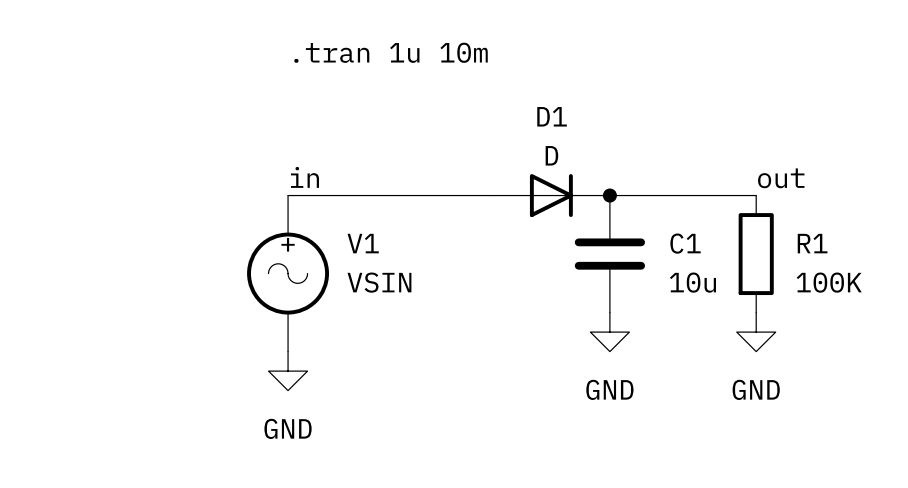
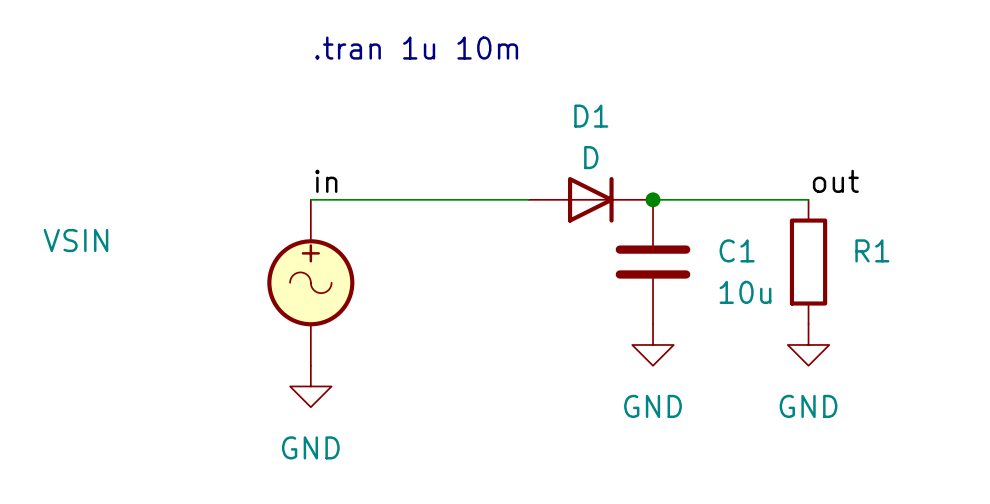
V1 name: V1 (363, 243) -> VSIN (75, 240)
V1 value: VSIN (379, 282) -> none
R1 value: 100K (829, 282) -> none

